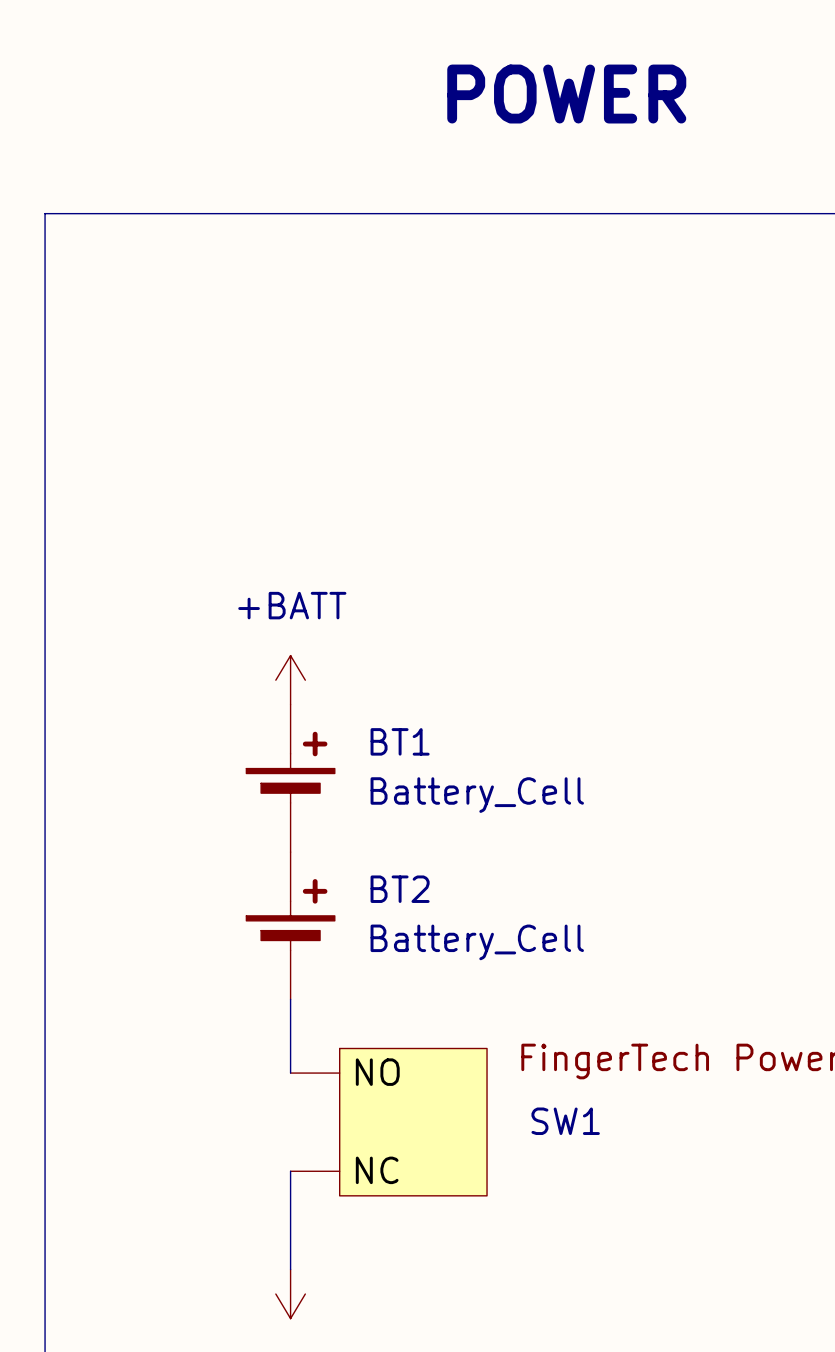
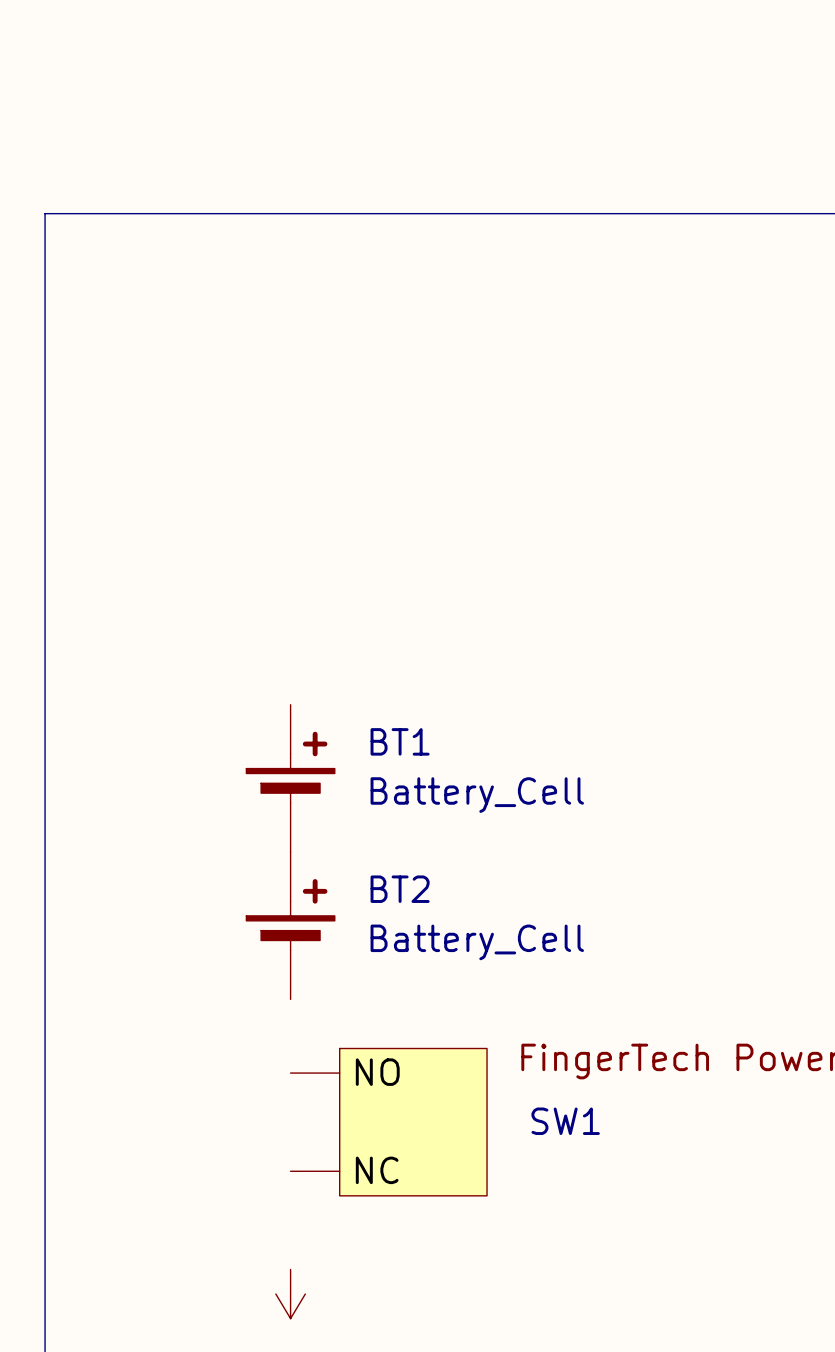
text: POWER (566, 94) -> none
power symbol: +BATT (290, 680) -> none
wire: (290, 999) (290, 1073) -> none
wire: (290, 1171) (290, 1269) -> none

